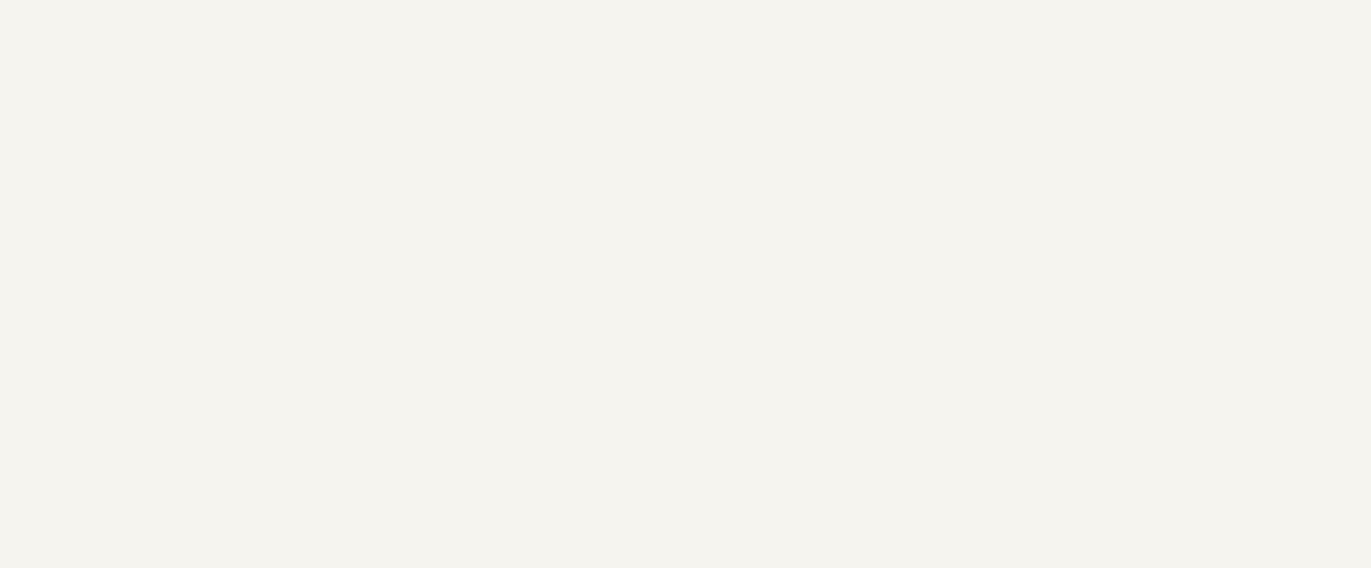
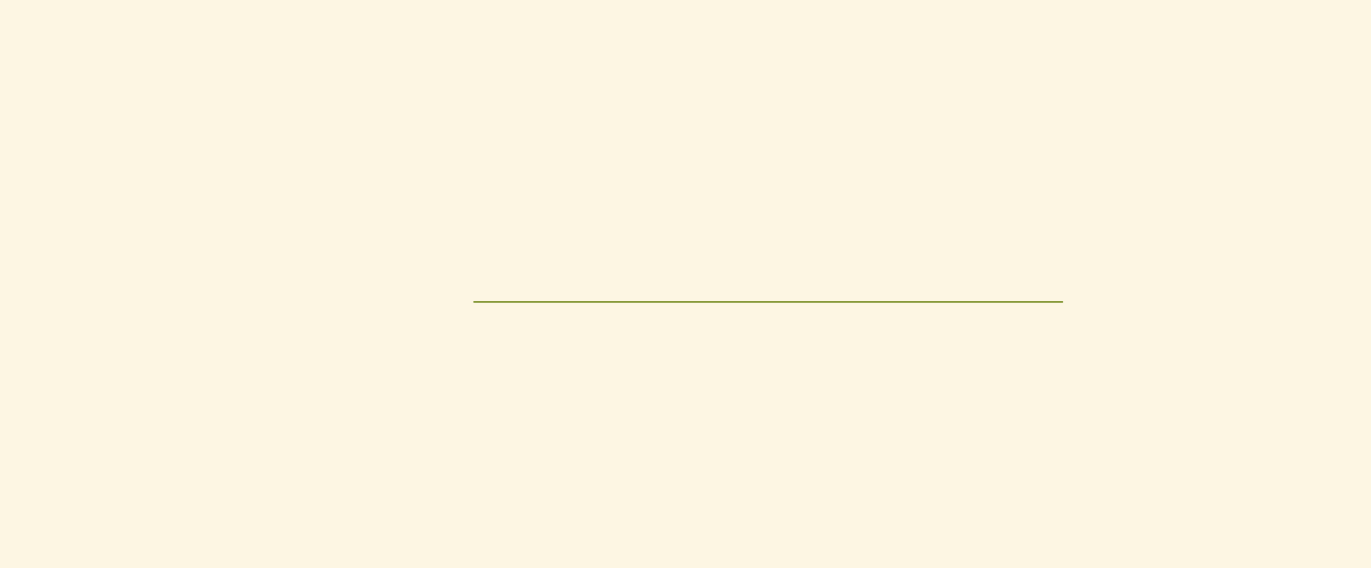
wire: none -> (473, 301) (1062, 301)

